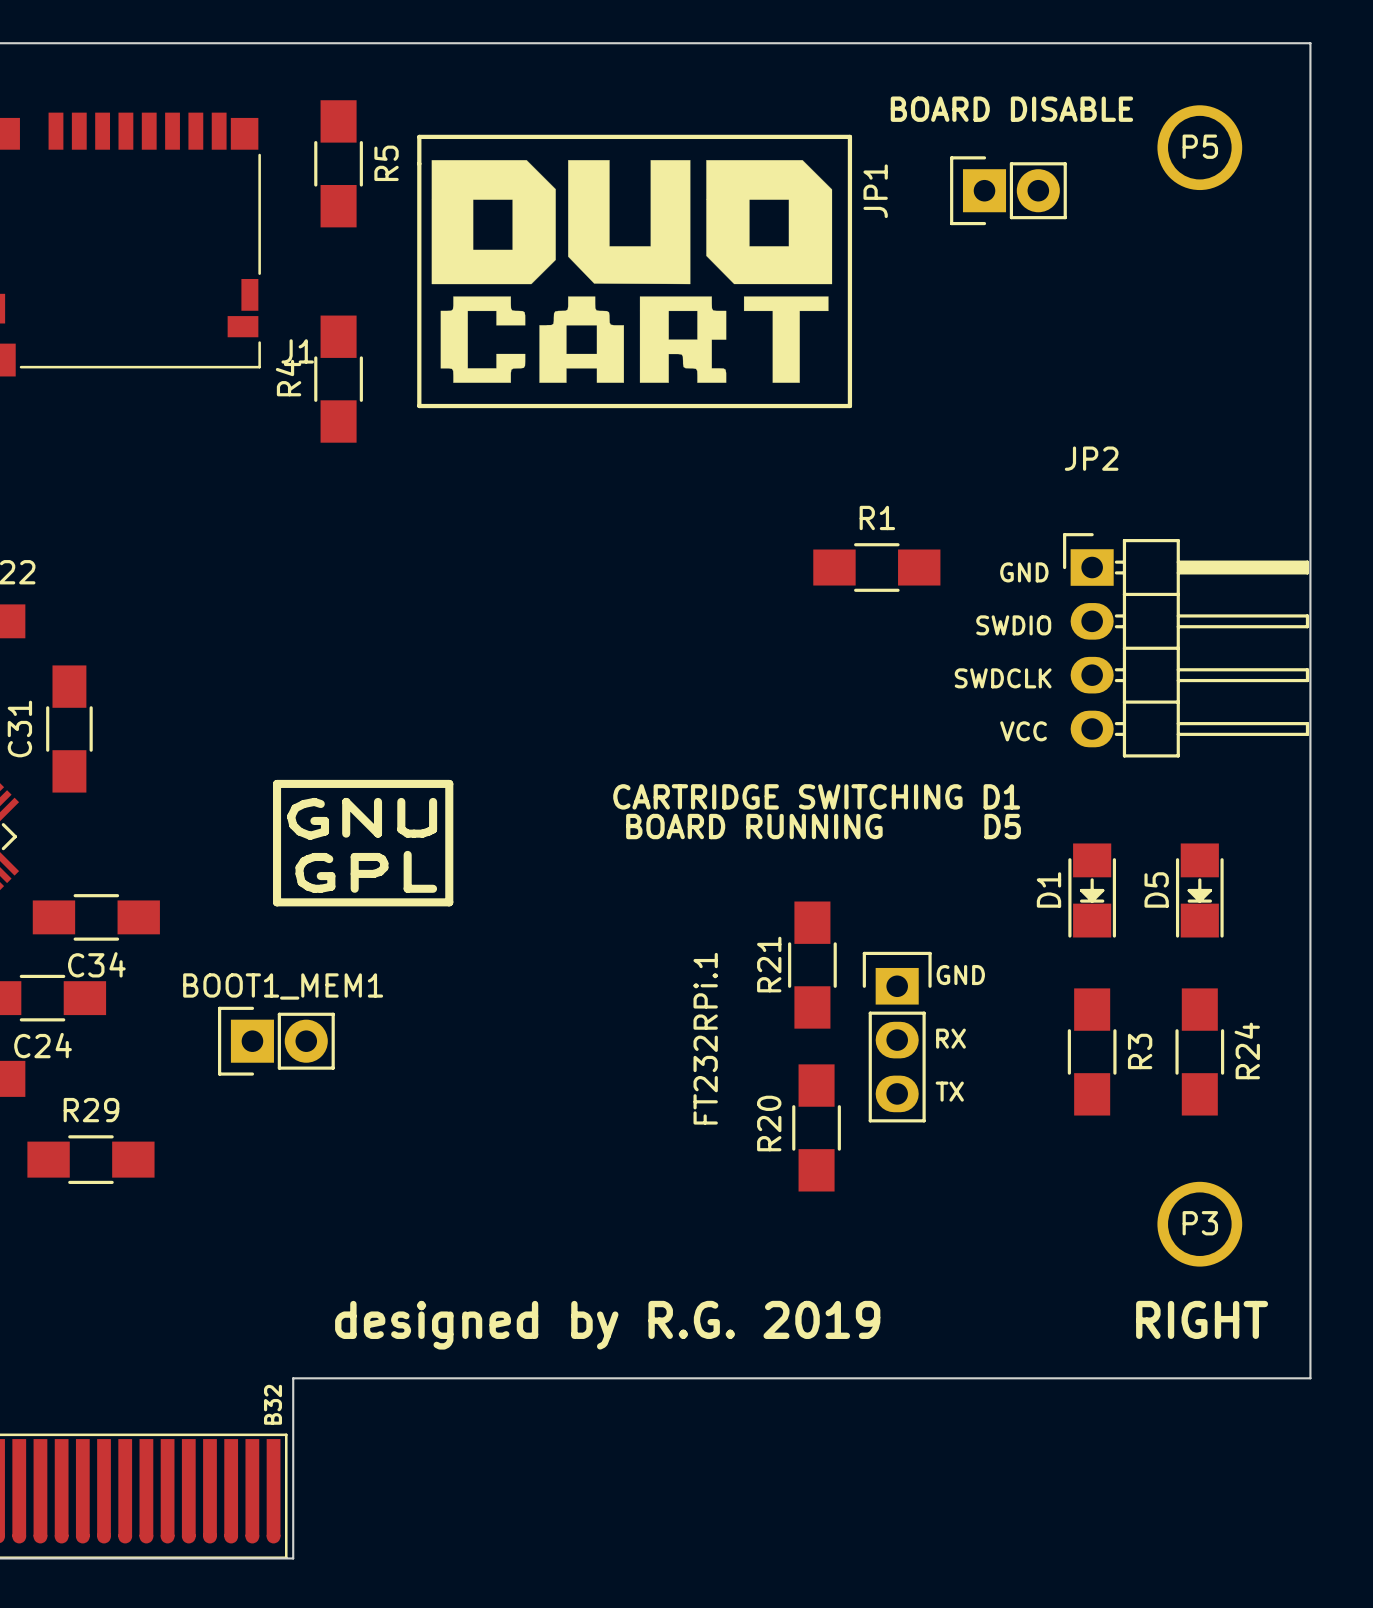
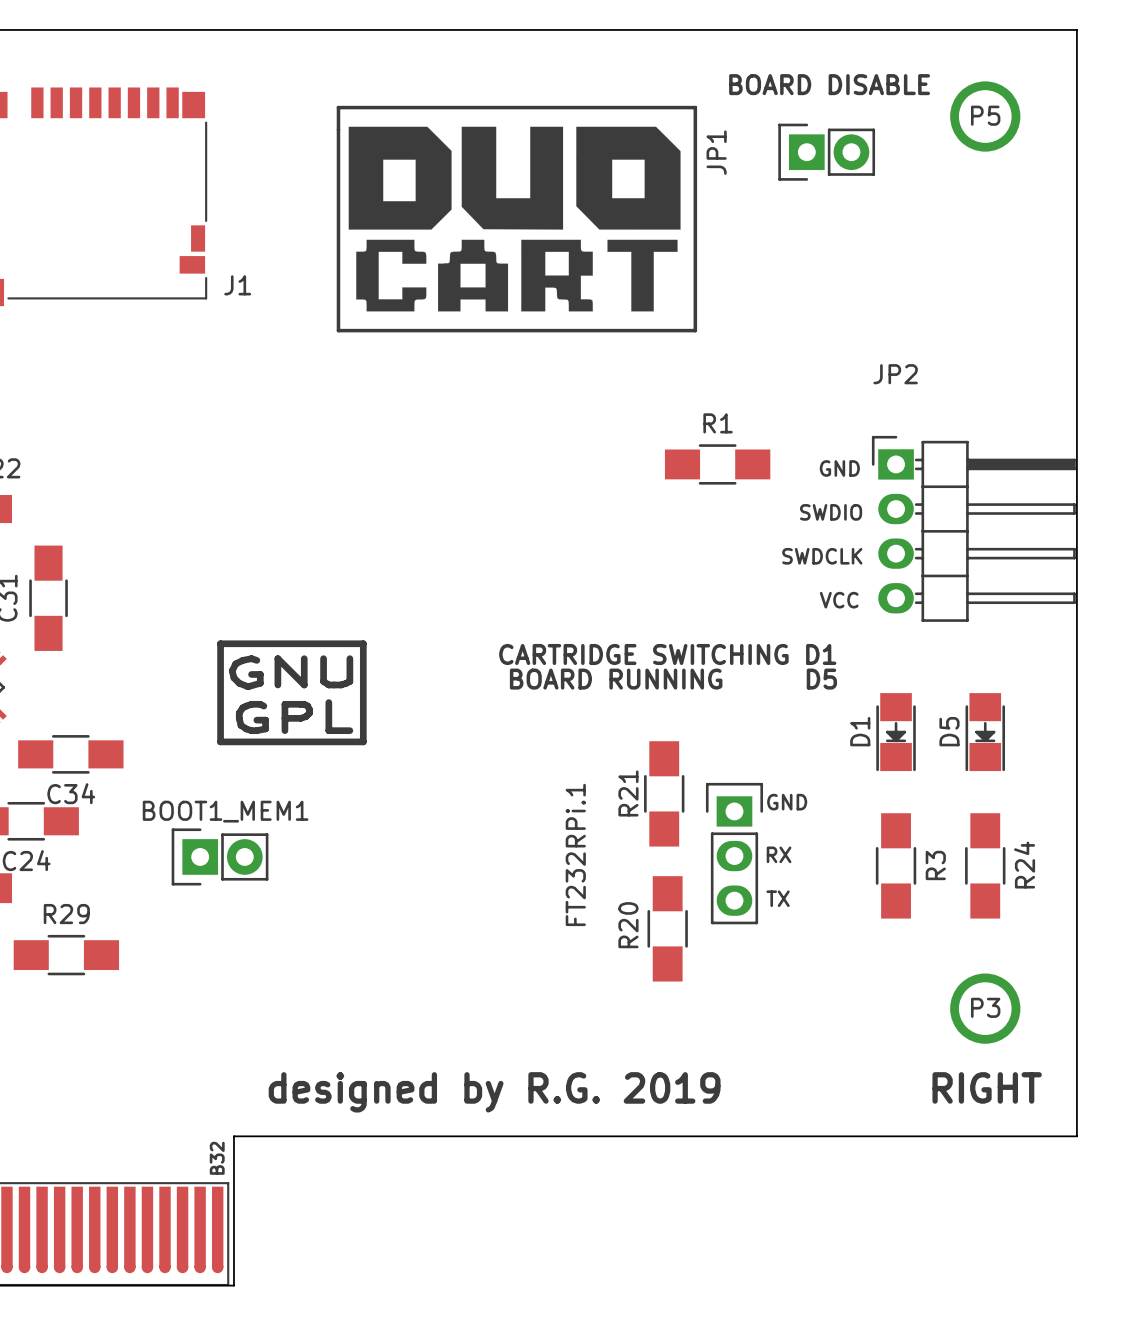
R5: (338, 163) -> none
R4: (338, 379) -> none

